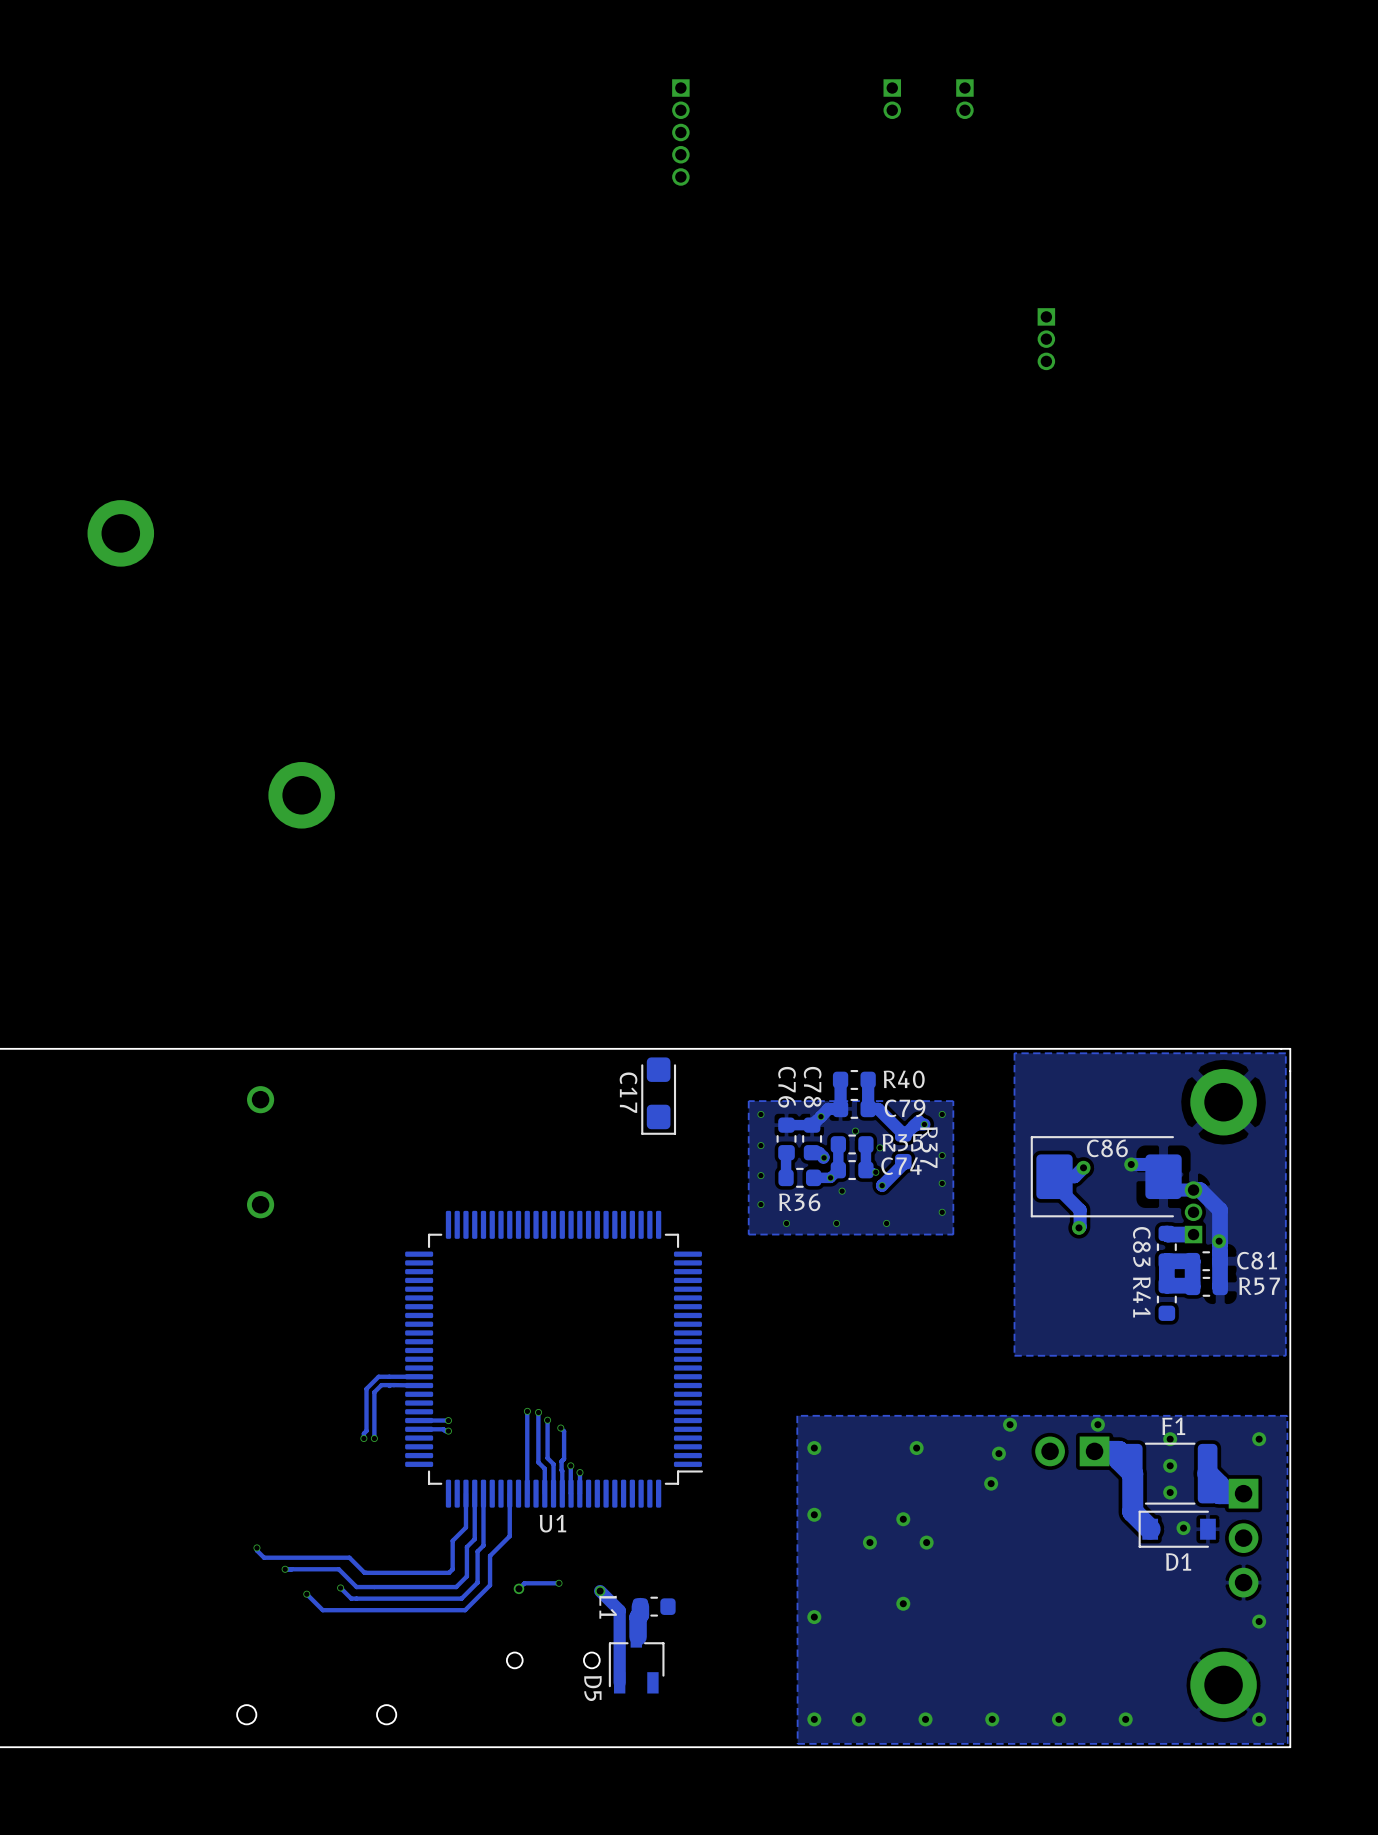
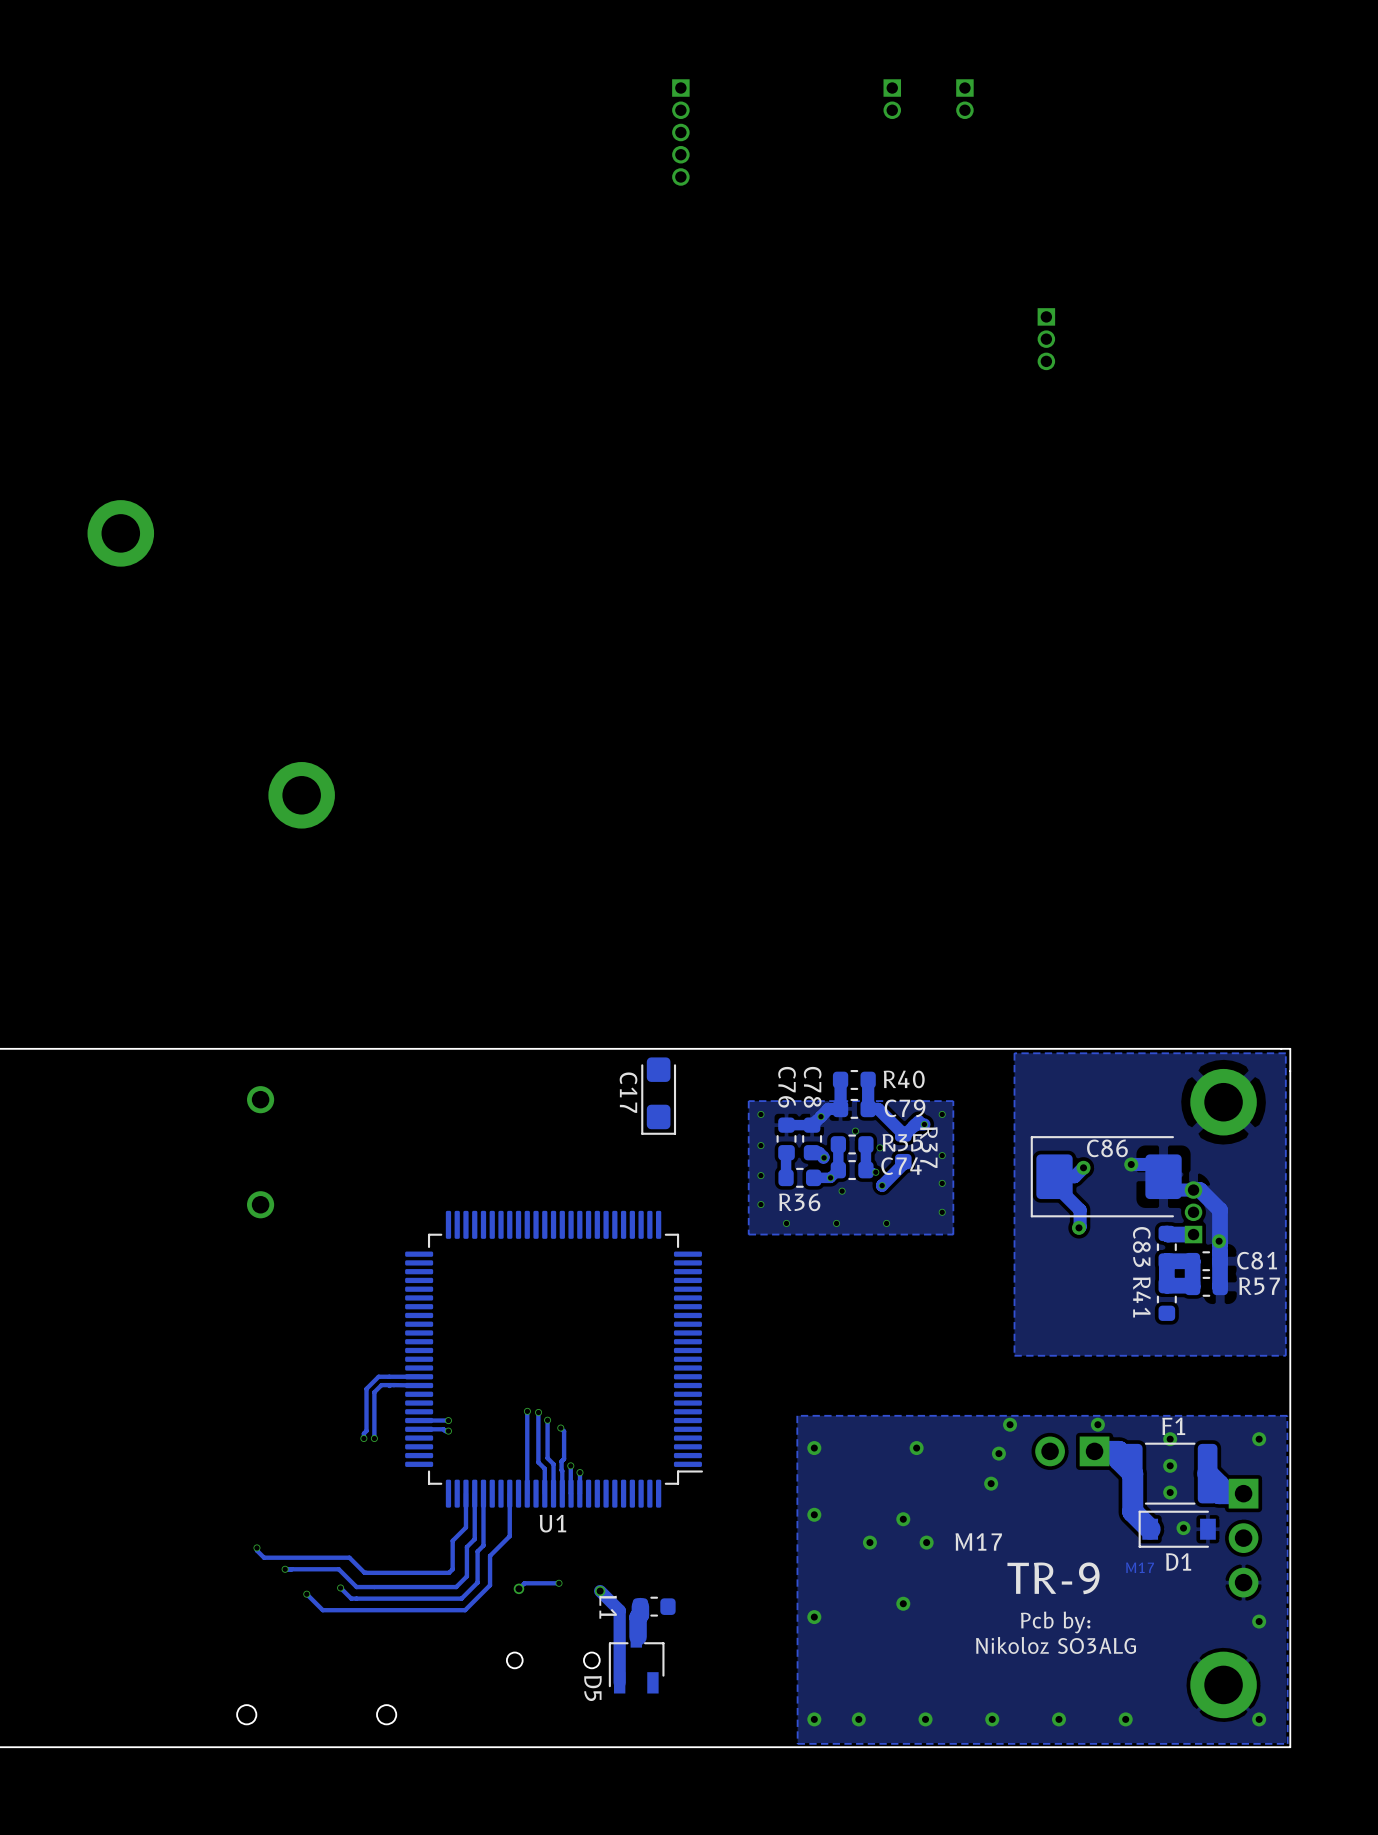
text: none -> M17 (978, 1541)
text: none -> M17 (1140, 1567)
text: none -> TR-9 (1053, 1578)
text: none -> Pcb by: (1055, 1622)
text: none -> Nikoloz SO3ALG (1056, 1645)

